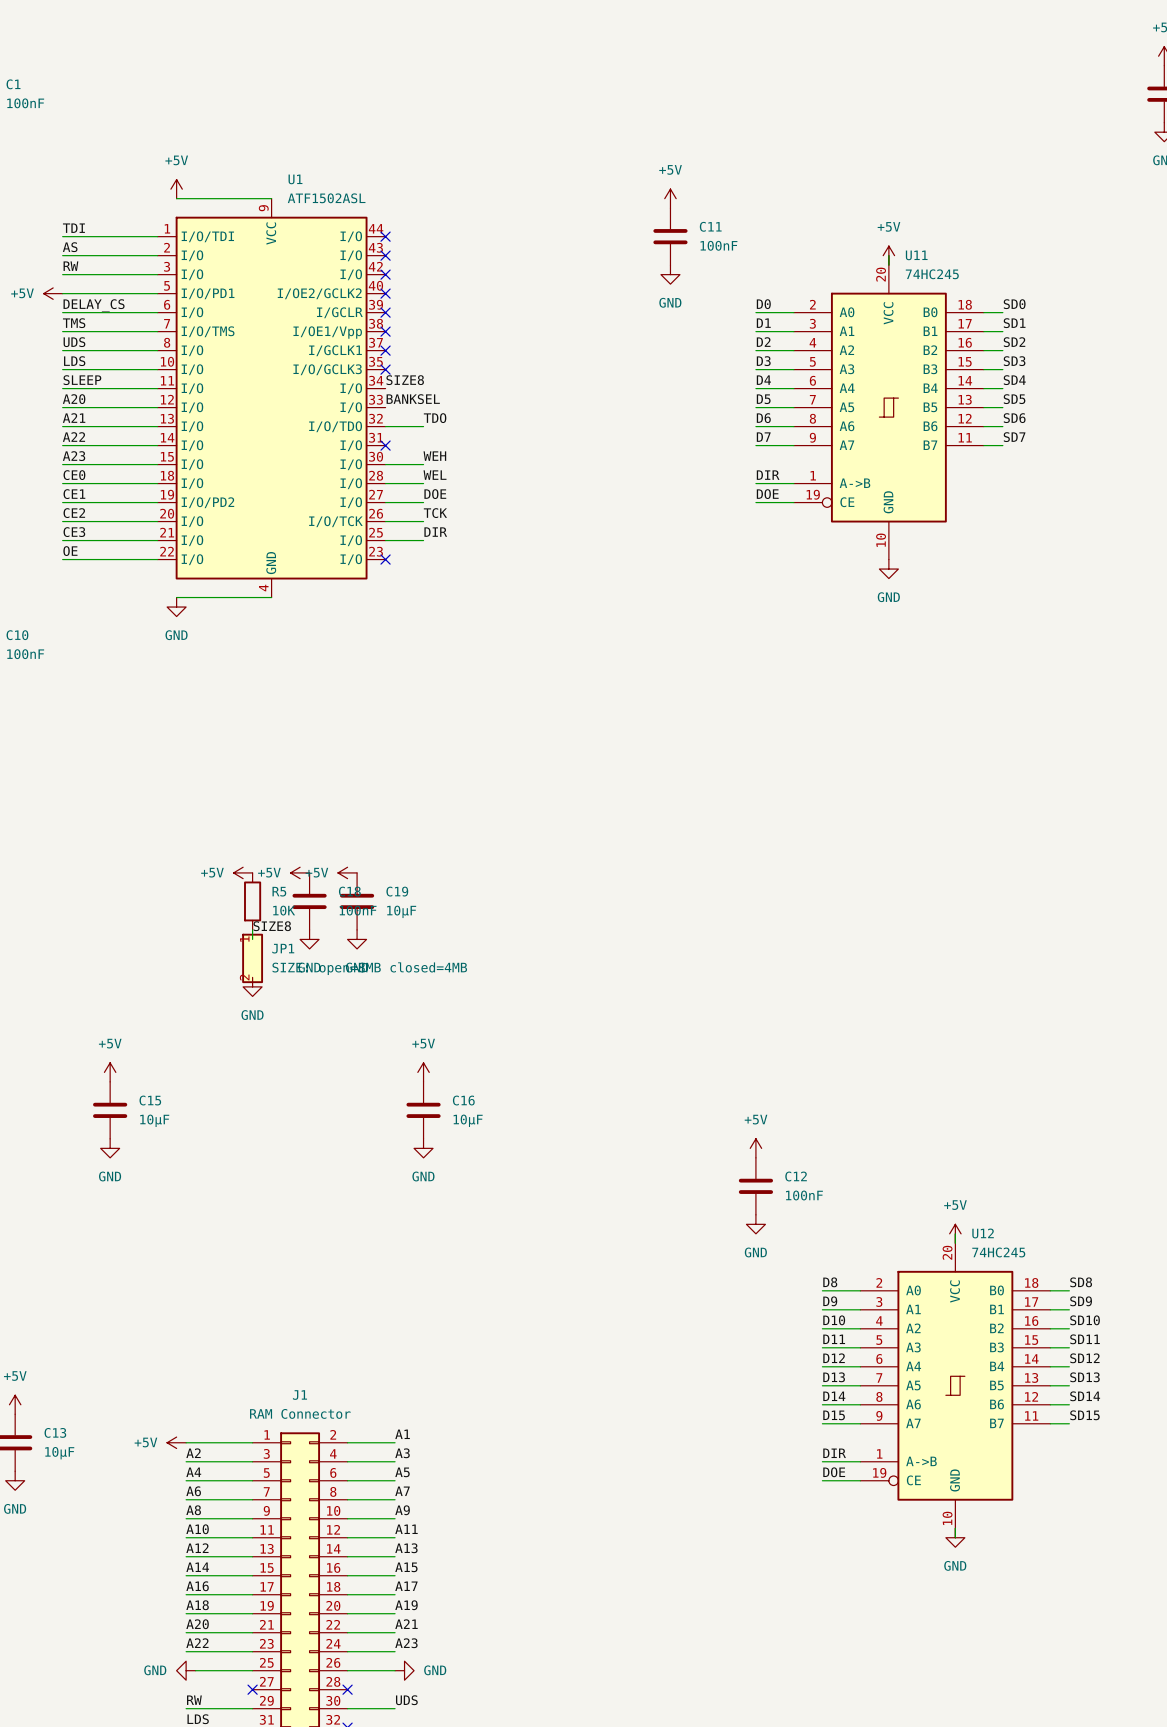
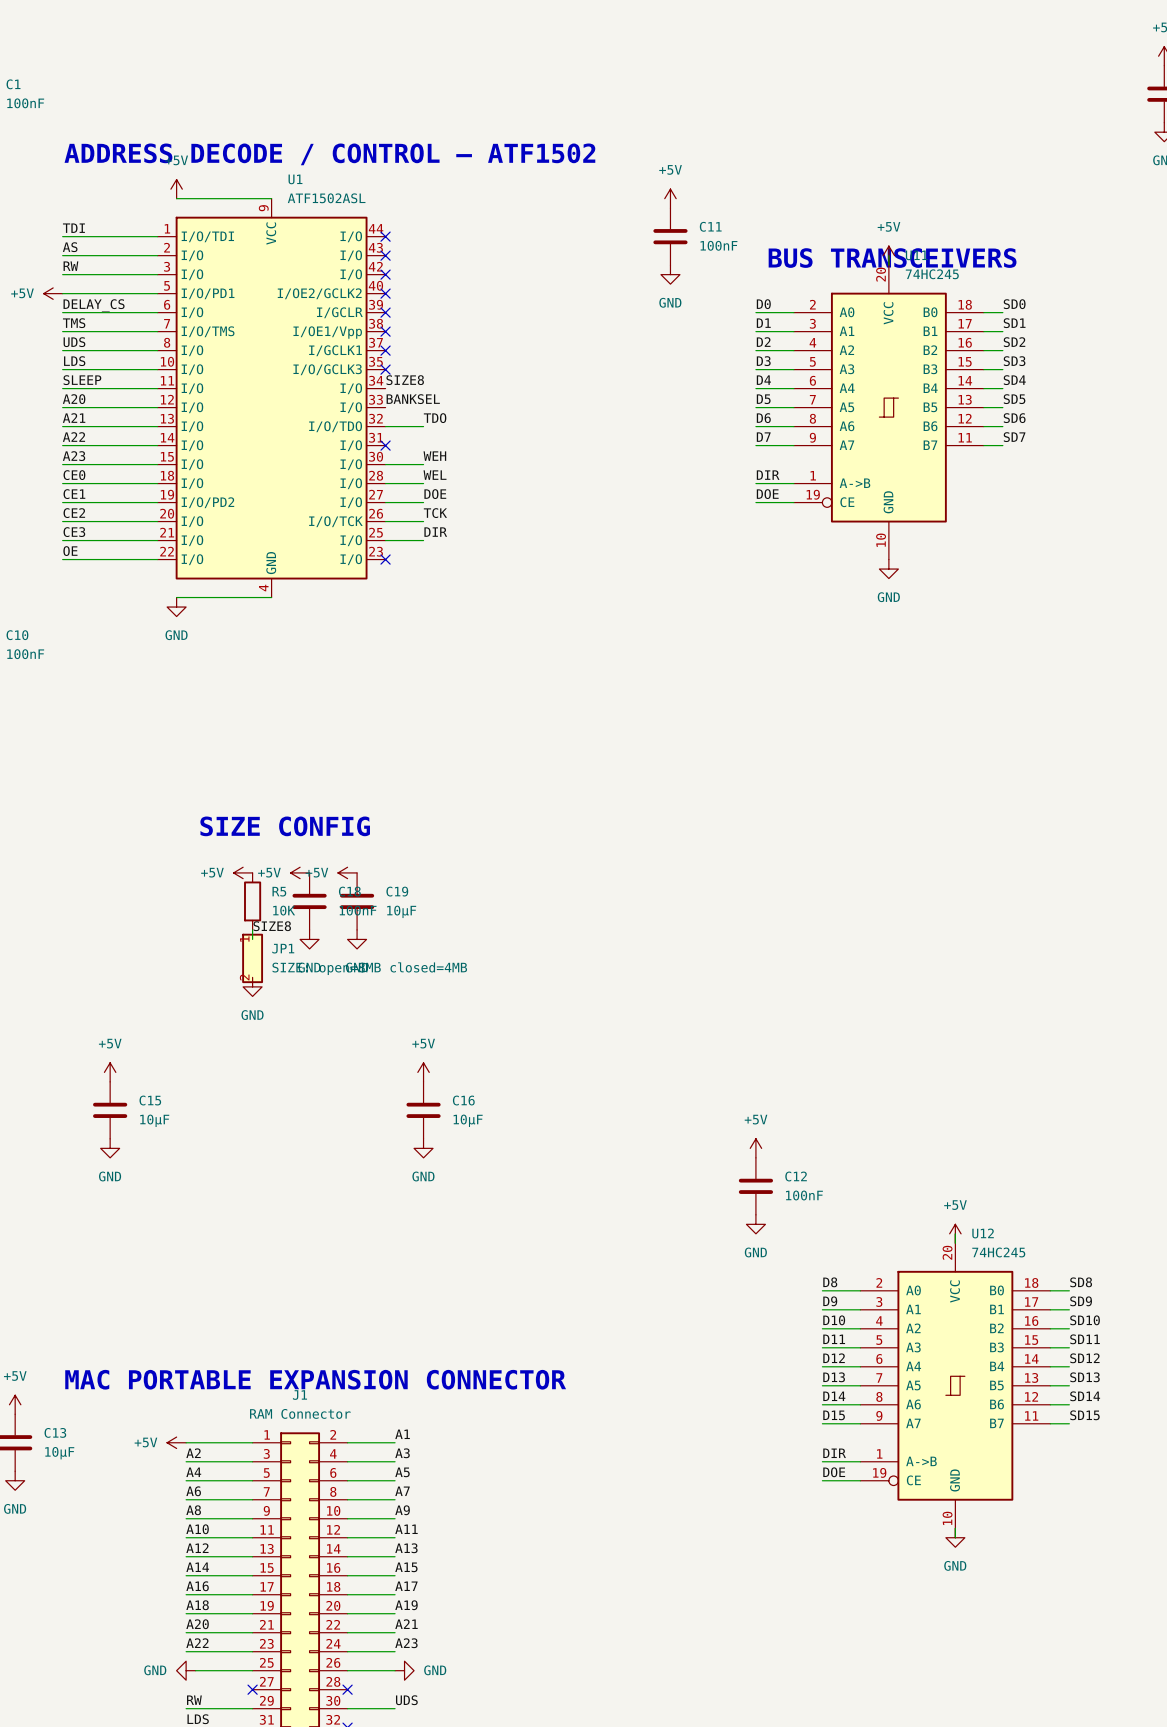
text: none -> ADDRESS DECODE / CONTROL — ATF1502 (329, 154)
text: none -> BUS TRANSCEIVERS (892, 258)
text: none -> SIZE CONFIG (285, 826)
text: none -> MAC PORTABLE EXPANSION CONNECTOR (315, 1379)

